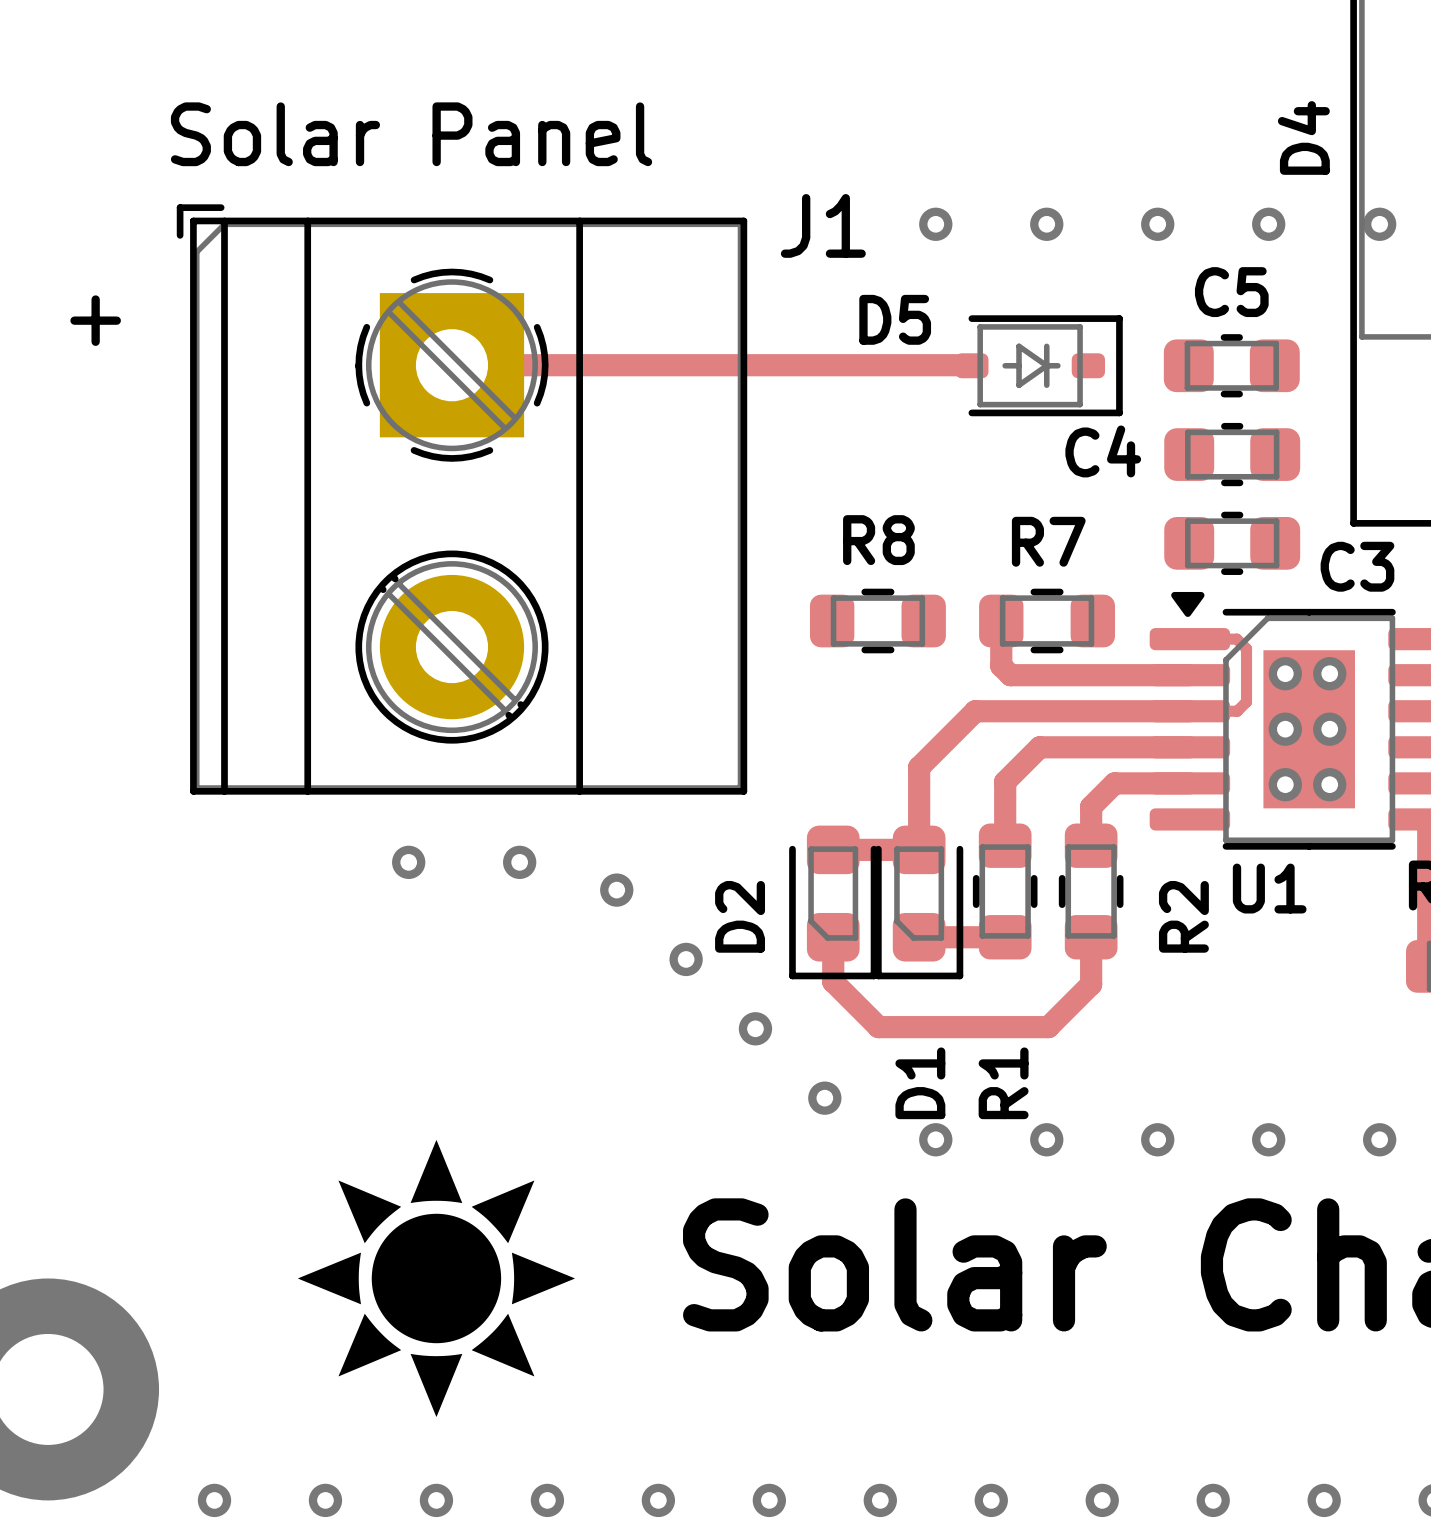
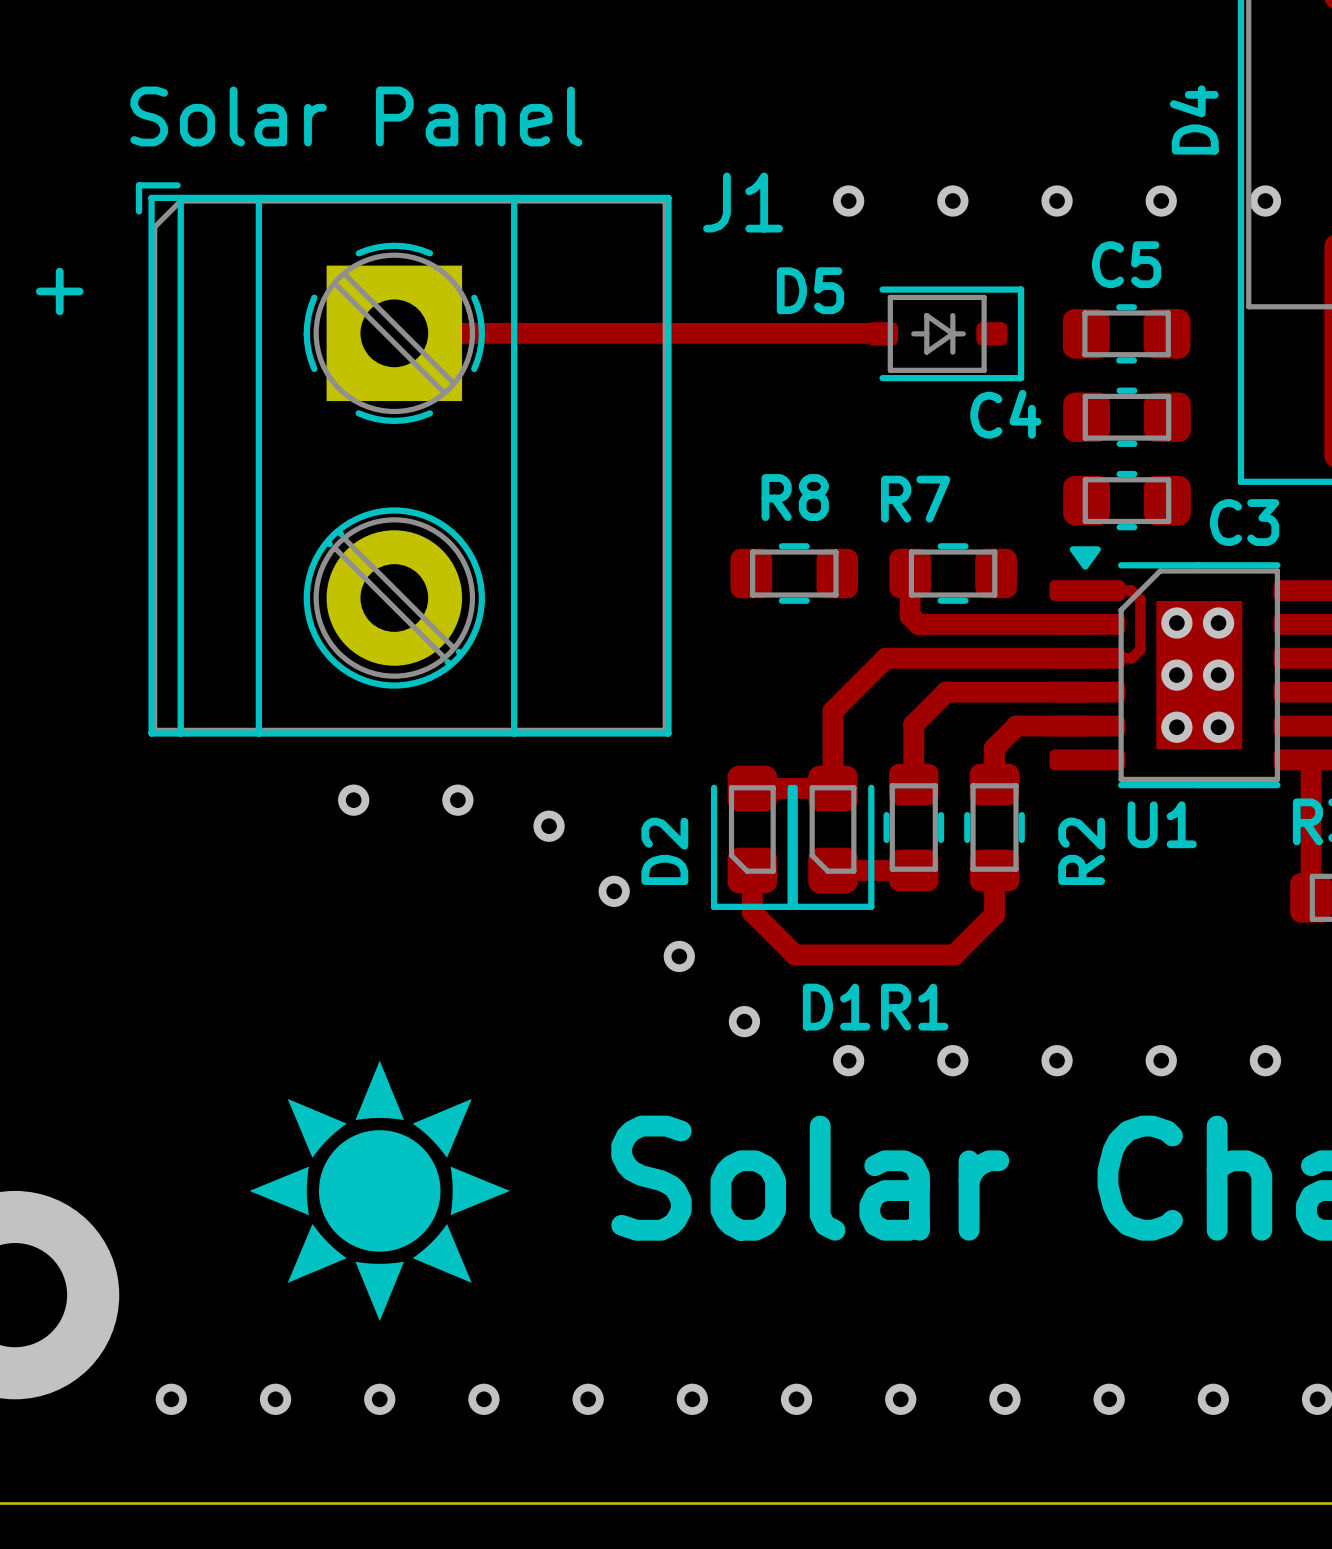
R7 name position: R7 (1048, 541) -> R7 (915, 499)
D1 name rotation: 0° (920, 1083) -> 90° clockwise (836, 1007)
R1 name rotation: 0° (1003, 1083) -> 90° clockwise (914, 1007)

